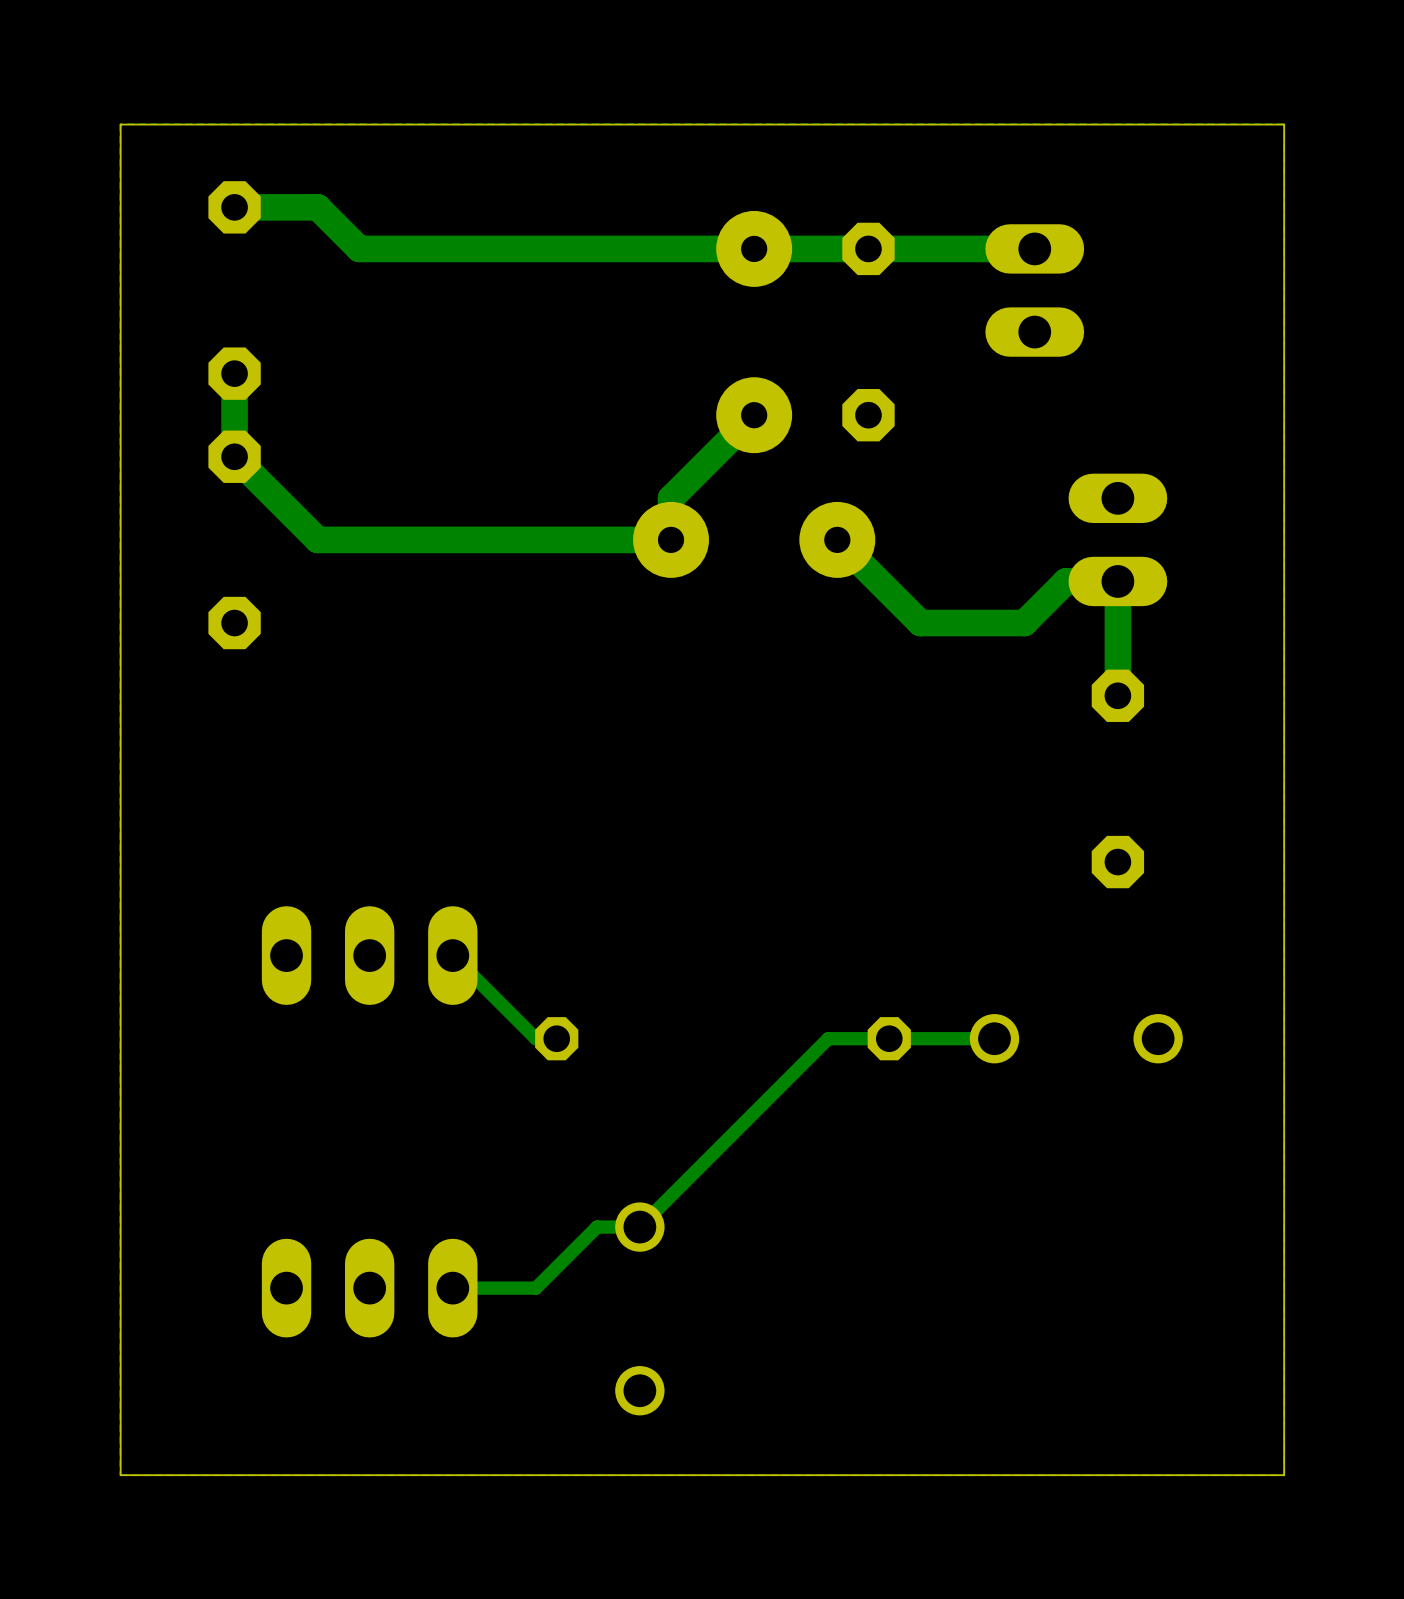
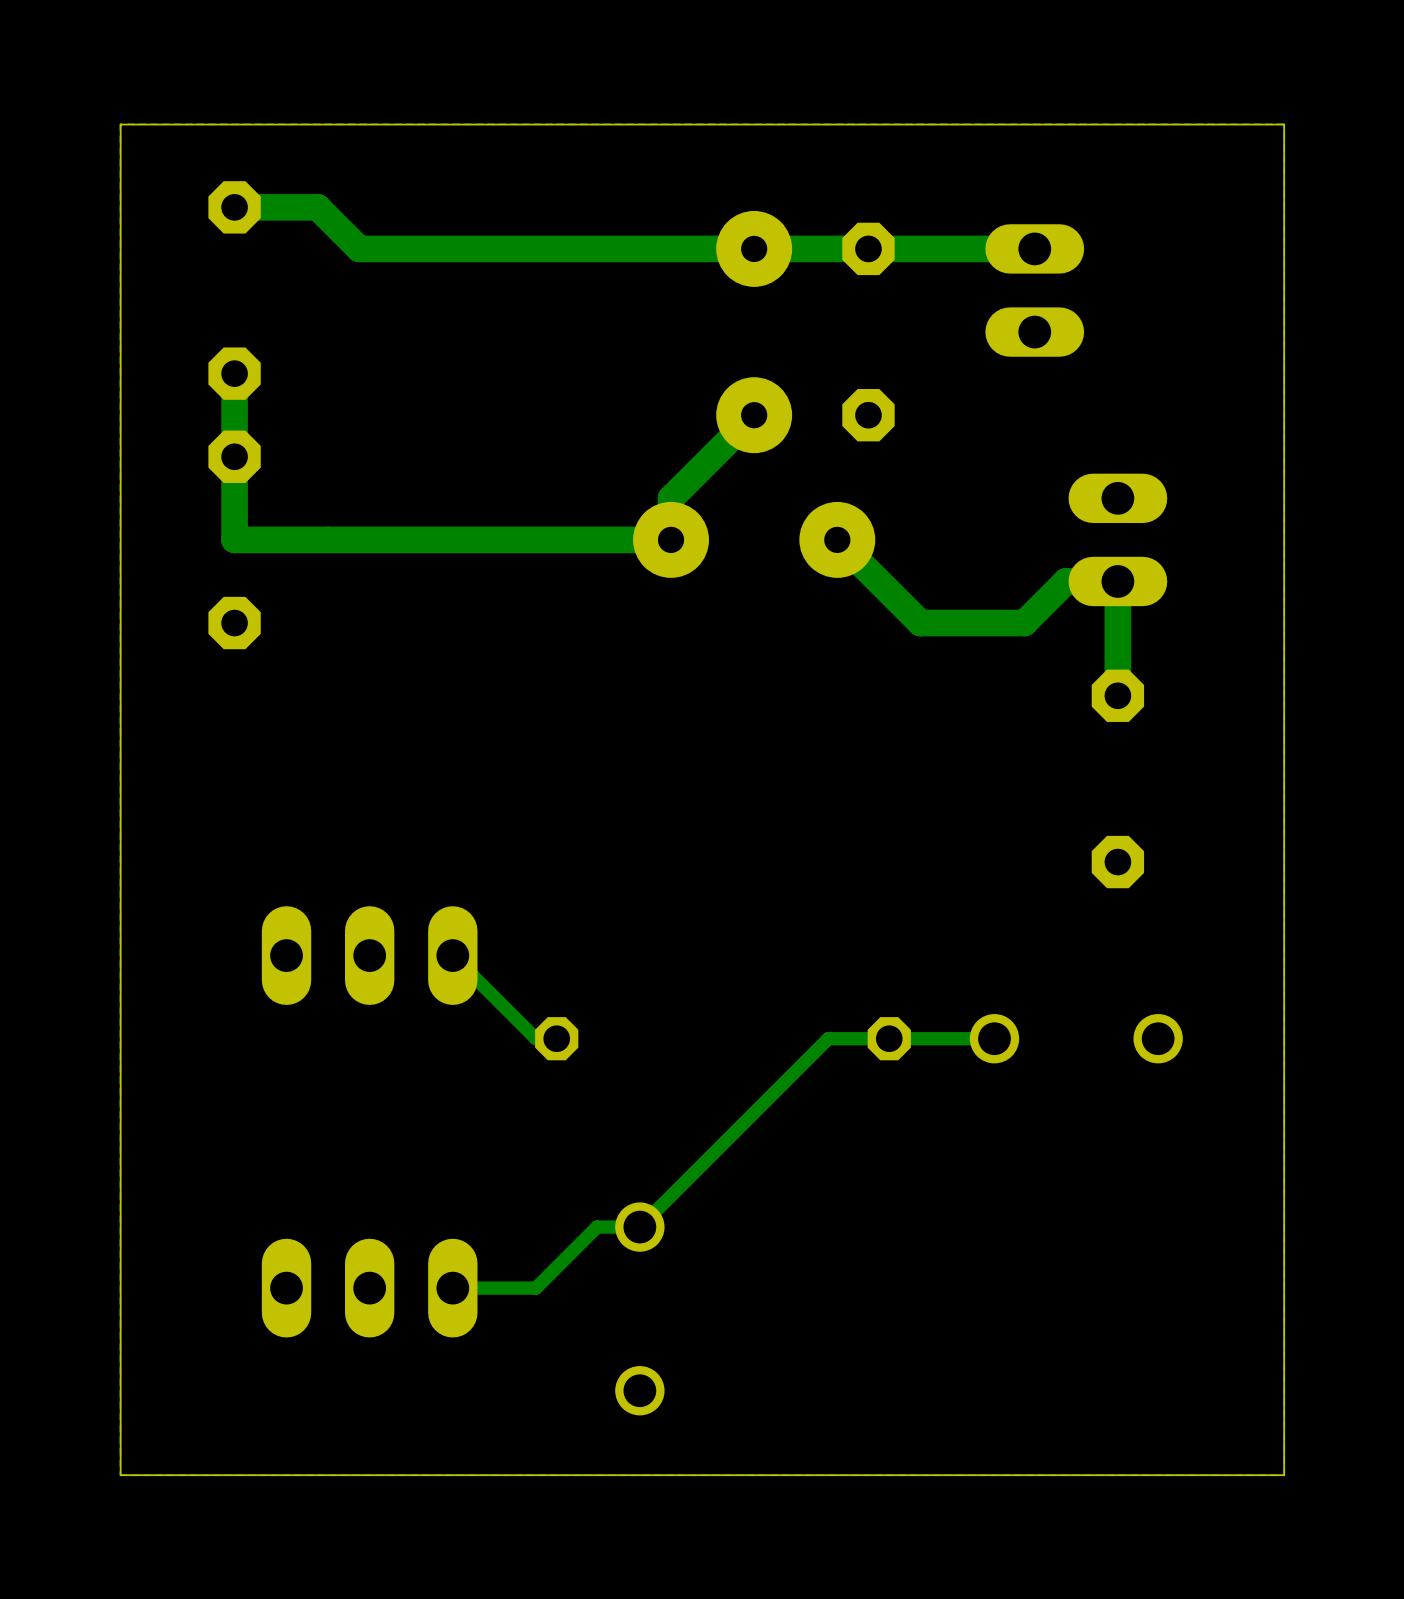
bottom track: (276, 498) (234, 456) (317, 539) -> (234, 456) (234, 539) (317, 539)

